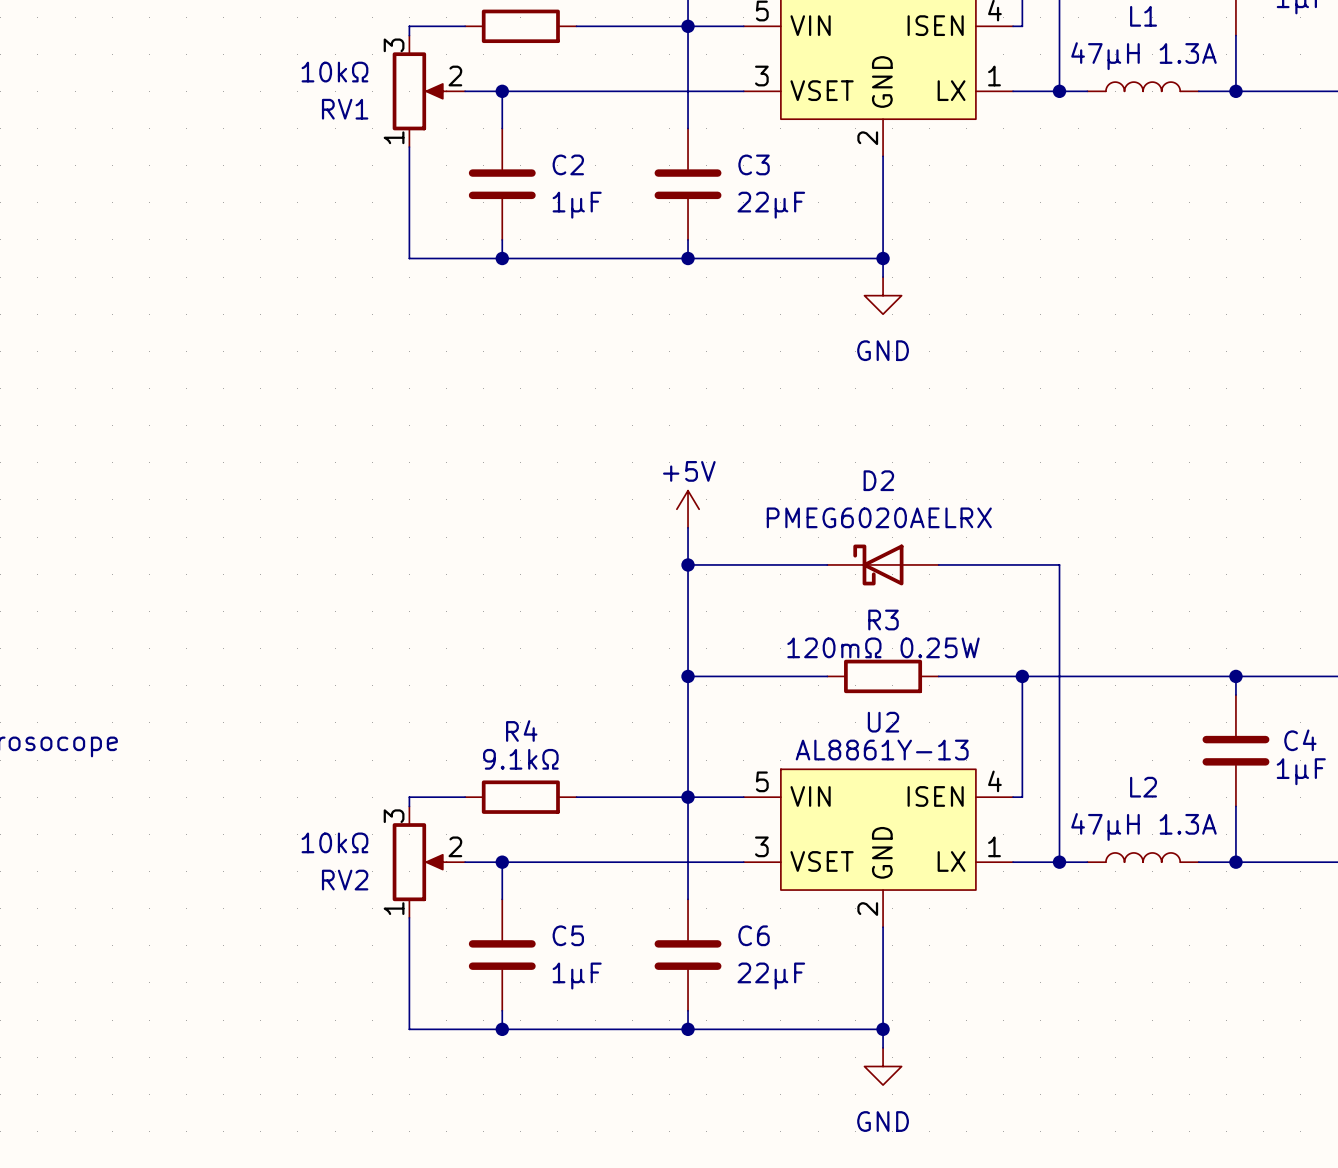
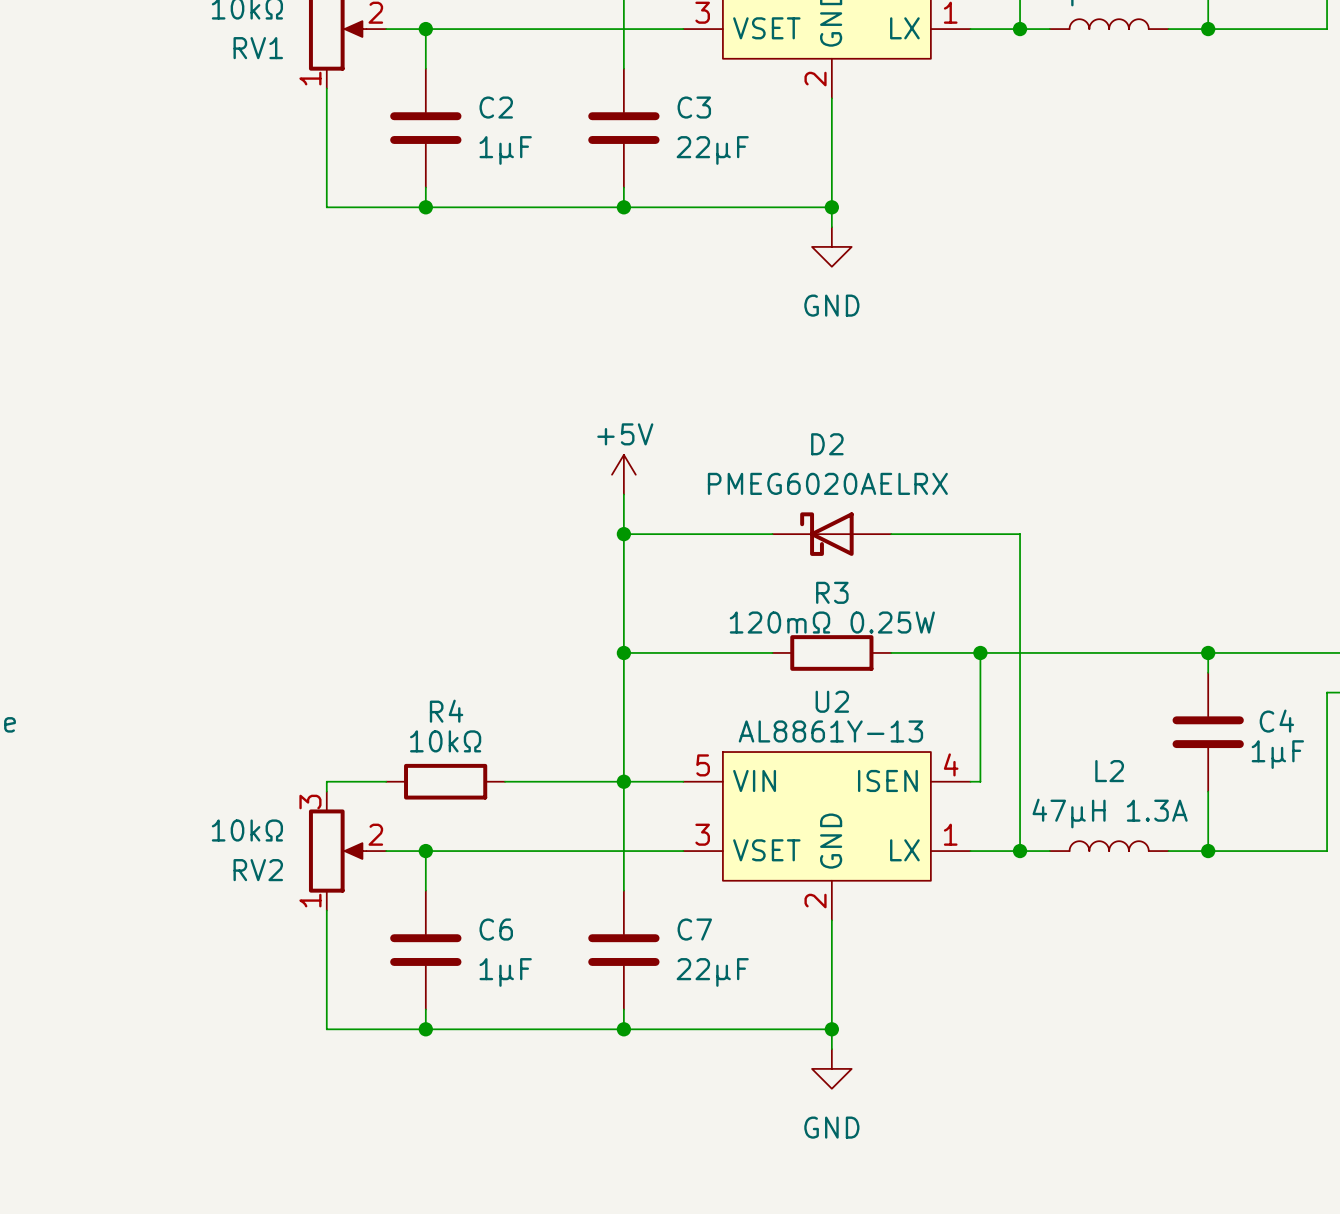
R4 value: 9.1kΩ (520, 759) -> 10kΩ (445, 741)
C5 name: C5 (568, 935) -> C6 (496, 929)
C6 name: C6 (754, 935) -> C7 (694, 929)

